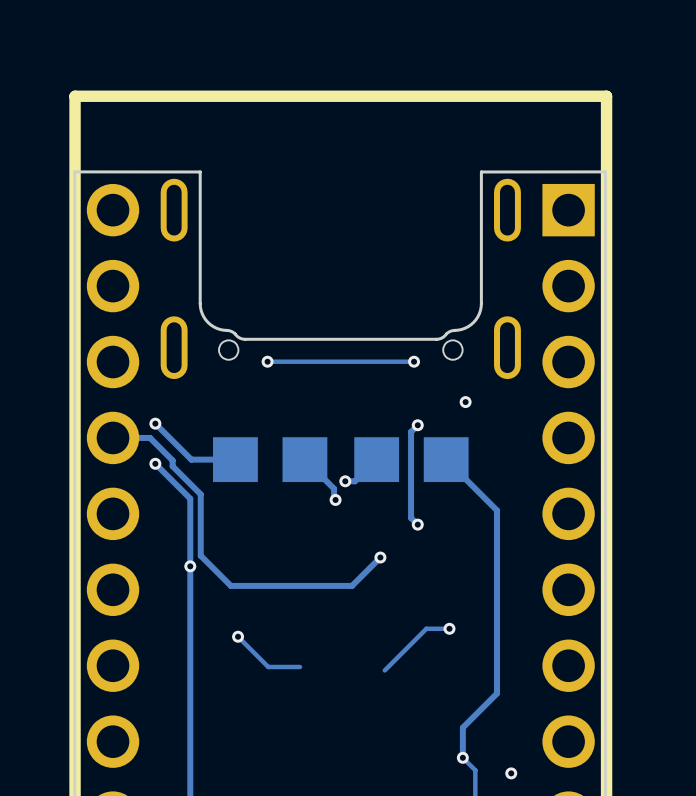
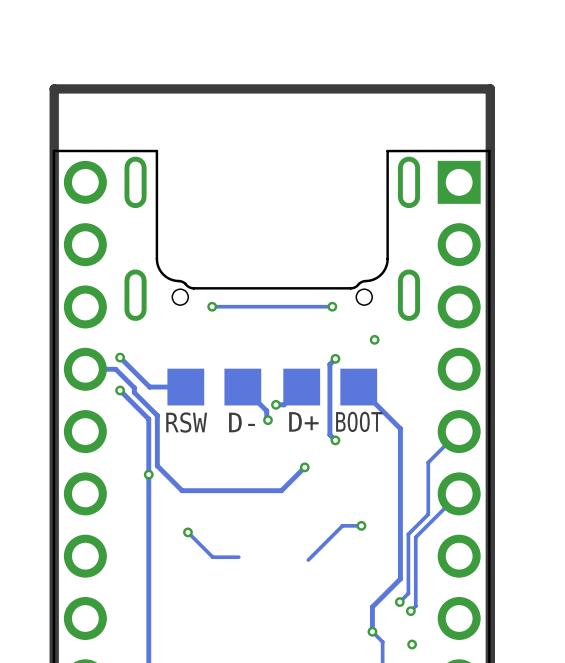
text: none -> RSW (186, 422)
text: none -> D- (242, 422)
text: none -> D+ (303, 421)
text: none -> BOOT (359, 421)
track: none -> (459, 431) (428, 462) (428, 514) (408, 534) (408, 593) (399, 602)
track: none -> (459, 493) (415, 537) (415, 606) (410, 611)
via: none -> (399, 602)
via: none -> (410, 611)

